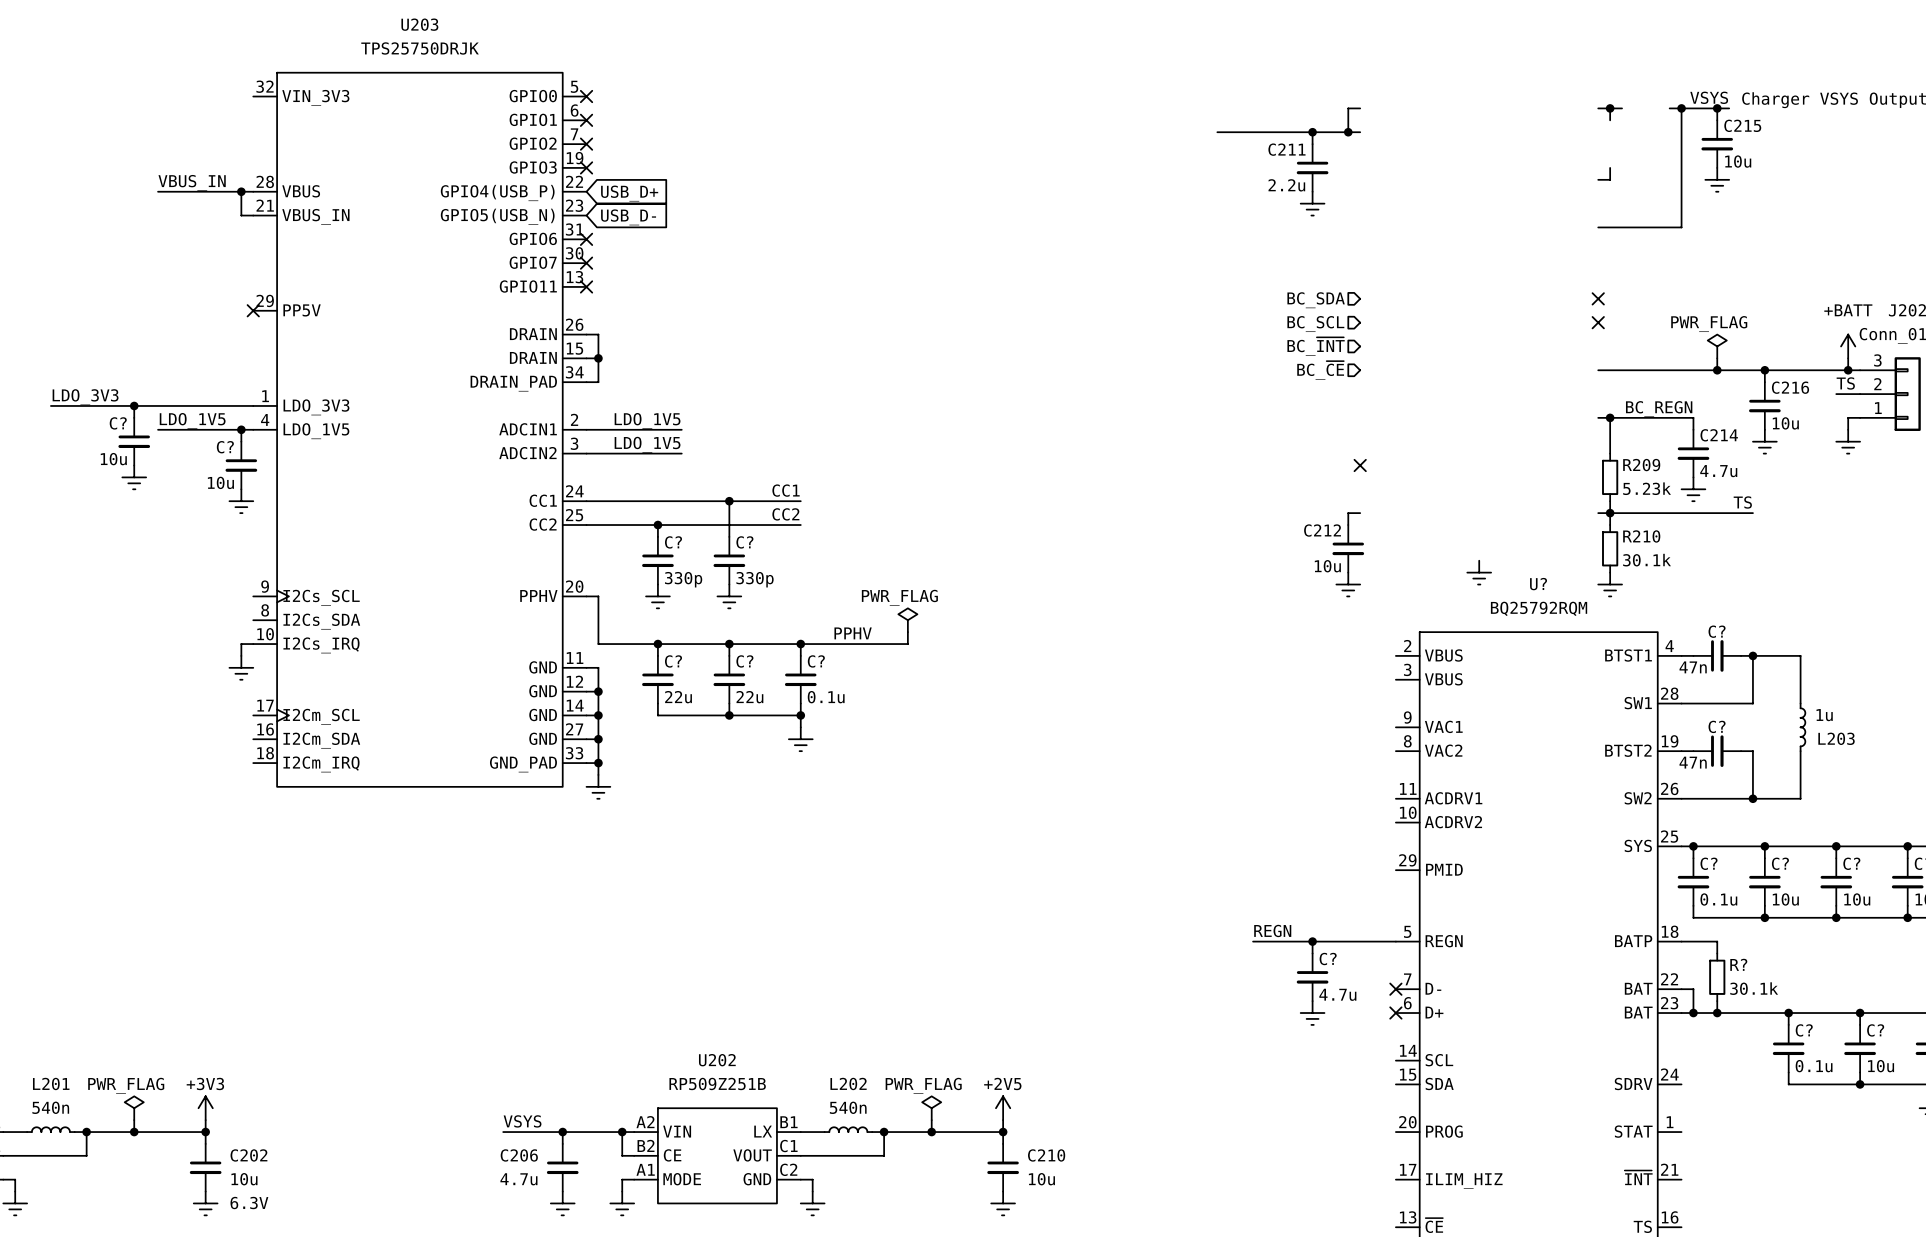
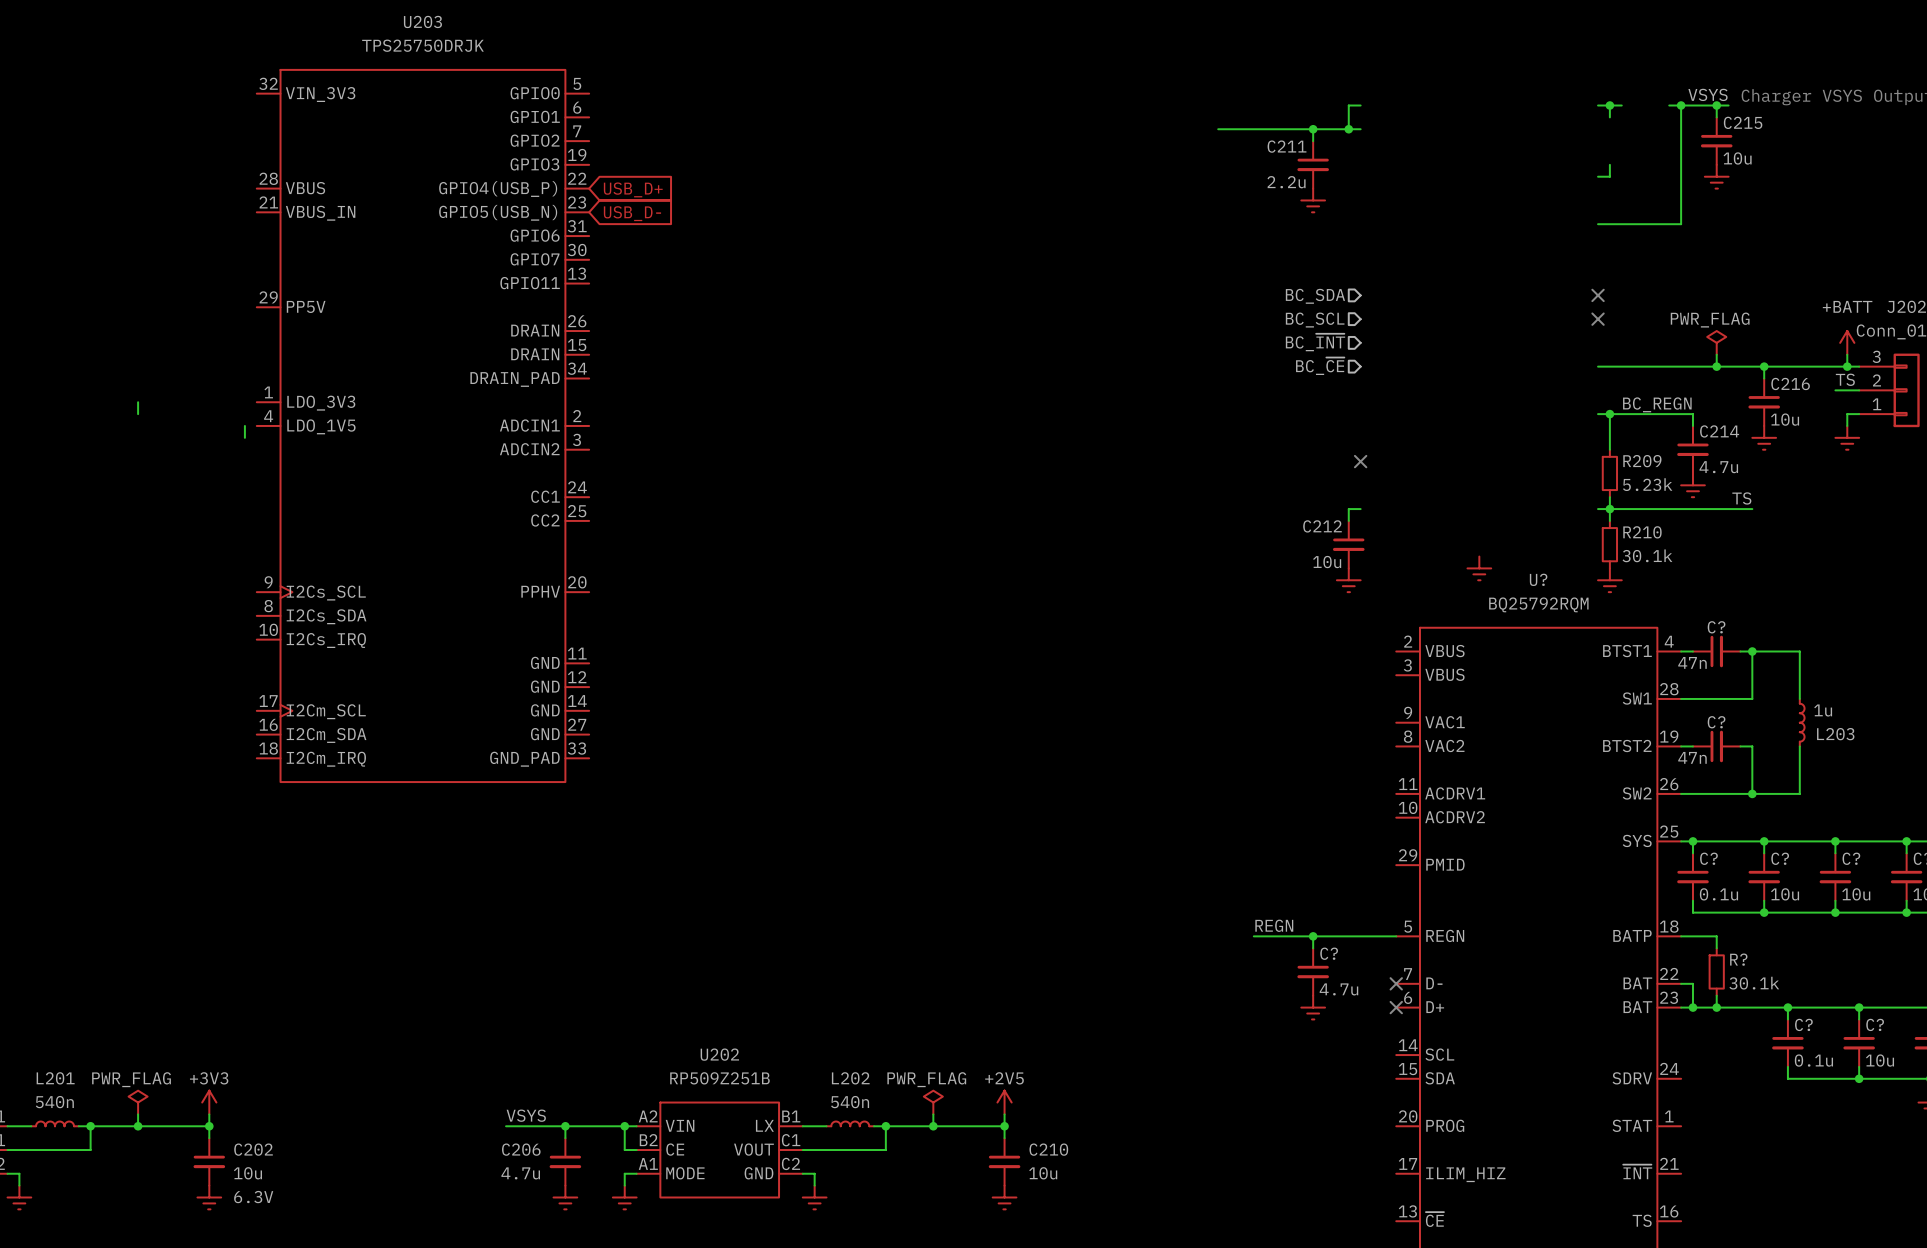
no-connect mark: (586, 96) -> none
no-connect mark: (586, 120) -> none
no-connect mark: (586, 144) -> none
no-connect mark: (586, 167) -> none
label: VBUS_IN (192, 182) -> none
wire: (158, 191) (253, 191) -> none
wire: (241, 191) (241, 215) (253, 215) -> none
junction: (241, 191) -> none
no-connect mark: (586, 239) -> none
no-connect mark: (586, 263) -> none
no-connect mark: (586, 286) -> none
no-connect mark: (253, 310) -> none
wire: (586, 334) (598, 334) (598, 382) (586, 382) -> none
wire: (586, 358) (598, 358) -> none
junction: (598, 358) -> none
label: LDO_3V3 (85, 397) -> none
wire: (50, 405) (253, 405) -> none
junction: (134, 405) -> none
label: LDO_1V5 (192, 420) -> none
label: LDO_1V5 (647, 420) -> none
wire: (158, 429) (253, 429) -> none
junction: (241, 429) -> none
wire: (586, 429) (681, 429) -> none
C?: 10u (134, 441) -> none
label: LDO_1V5 (647, 444) -> none
wire: (586, 453) (681, 453) -> none
C?: 10u (241, 465) -> none
power symbol: (134, 477) -> none
label: CC1 (786, 490) -> none
power symbol: (241, 501) -> none
wire: (586, 501) (800, 501) -> none
wire: (729, 501) (729, 536) -> none
junction: (729, 501) -> none
label: CC2 (785, 514) -> none
wire: (586, 525) (800, 525) -> none
wire: (657, 525) (657, 536) -> none
junction: (657, 525) -> none
C?: 330p (657, 560) -> none
C?: 330p (729, 560) -> none
wire: (586, 596) (598, 596) (598, 644) (907, 644) (907, 632) -> none
power symbol: (657, 596) -> none
power symbol: (729, 596) -> none
power symbol: PWR_FLAG (907, 620) -> none
label: PPHV (853, 633) -> none
wire: (253, 644) (241, 644) (241, 655) -> none
wire: (657, 644) (657, 655) -> none
junction: (657, 644) -> none
wire: (729, 644) (729, 655) -> none
junction: (729, 644) -> none
wire: (800, 644) (800, 655) -> none
junction: (800, 644) -> none
power symbol: (241, 667) -> none
wire: (586, 667) (598, 667) (598, 774) -> none
C?: 22u (657, 679) -> none
C?: 22u (729, 679) -> none
C?: 0.1u (800, 679) -> none
wire: (586, 691) (598, 691) -> none
junction: (598, 691) -> none
wire: (657, 703) (657, 715) (800, 715) -> none
wire: (729, 703) (729, 715) -> none
wire: (800, 703) (800, 727) -> none
wire: (586, 715) (598, 715) -> none
junction: (598, 715) -> none
junction: (729, 715) -> none
junction: (800, 715) -> none
wire: (586, 739) (598, 739) -> none
junction: (598, 739) -> none
power symbol: (800, 739) -> none
wire: (586, 763) (598, 763) -> none
junction: (598, 763) -> none
power symbol: (598, 786) -> none

